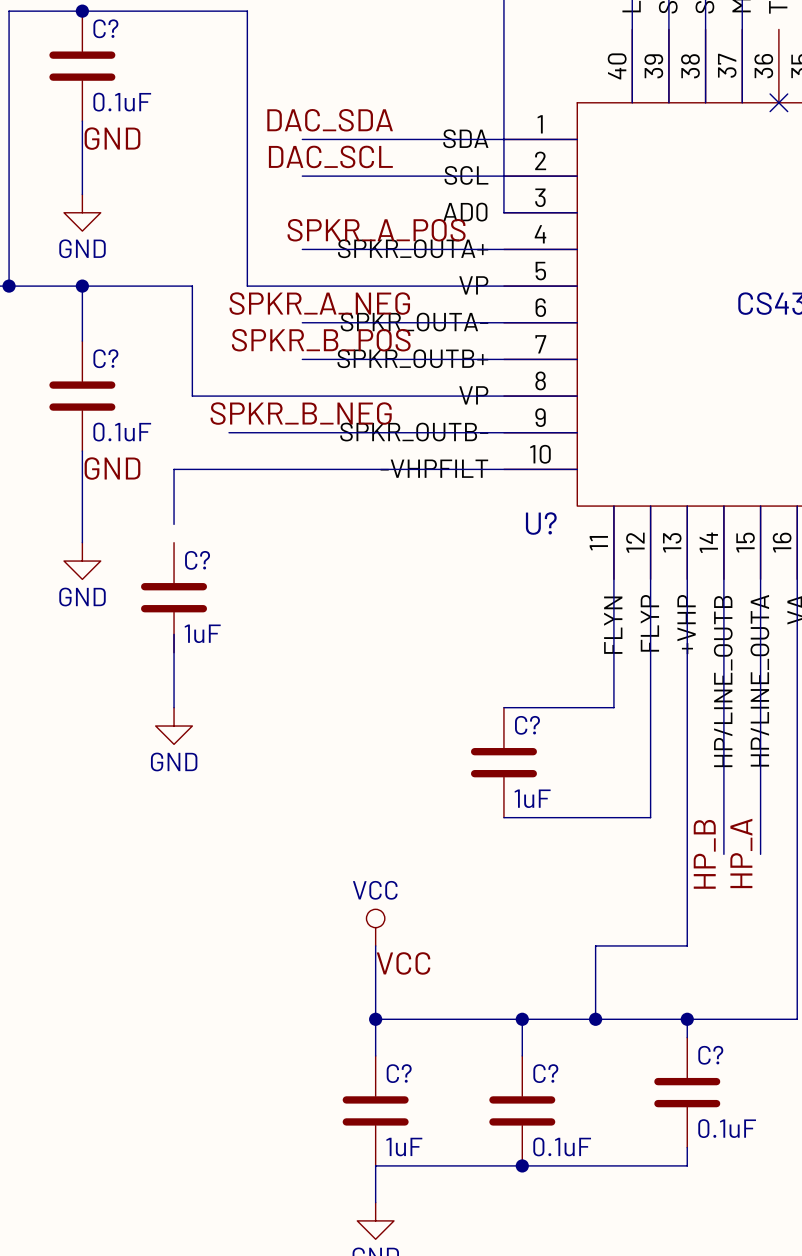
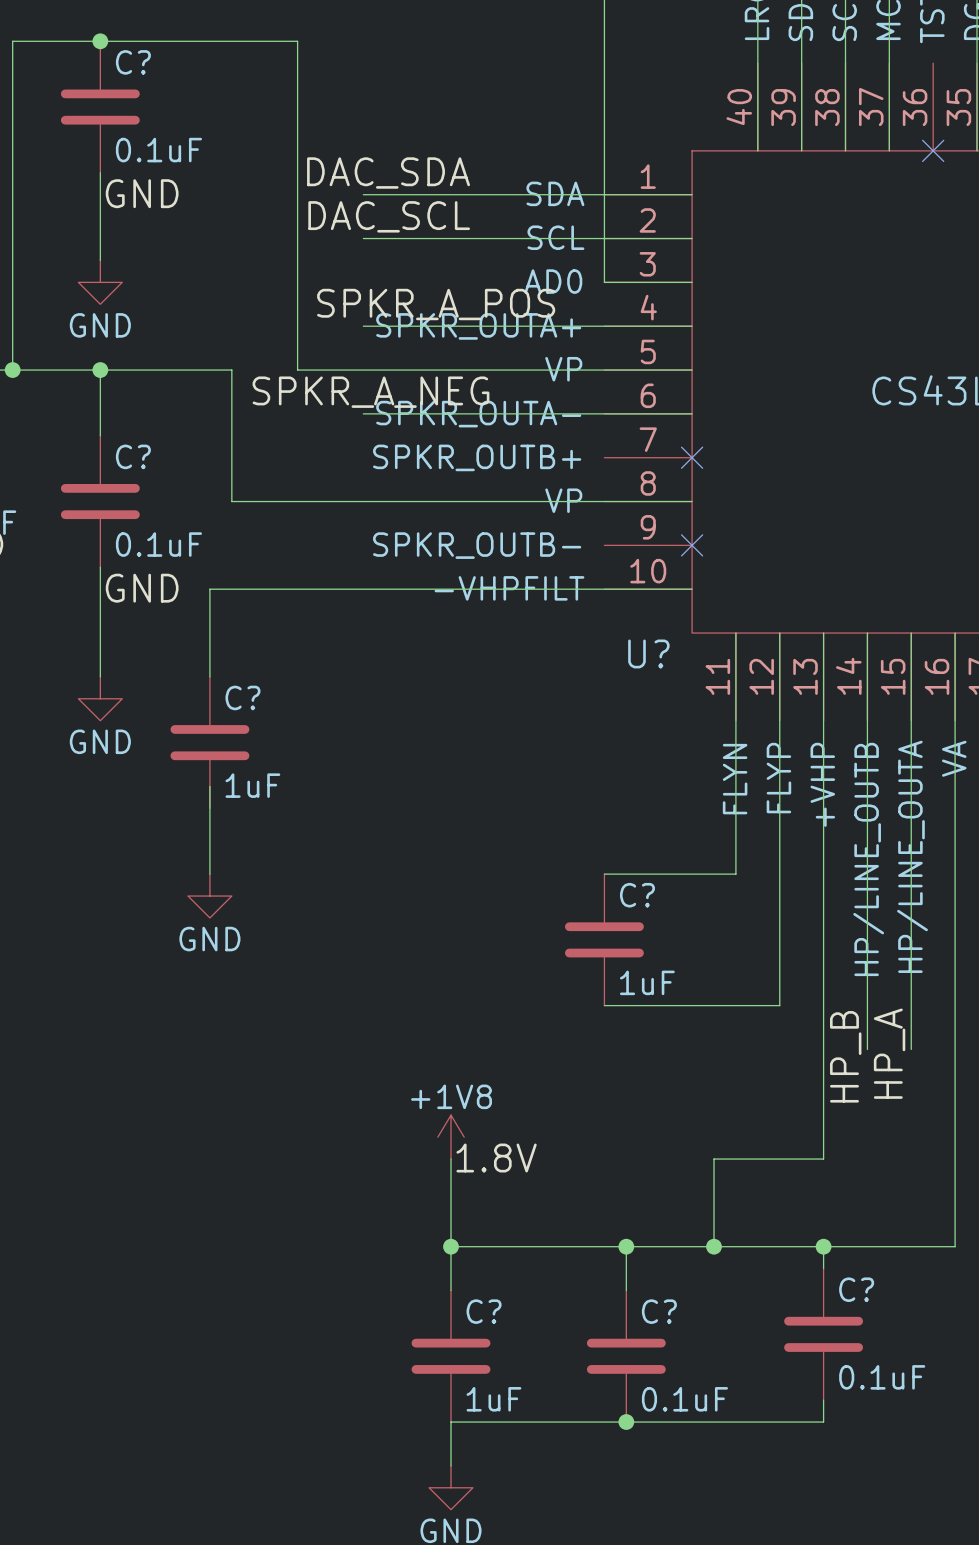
label: SPKR_B_POS (321, 340) -> none
wire: (302, 359) (577, 359) -> none
no-connect mark: none -> (692, 457)
label: SPKR_B_NEG (301, 413) -> none
wire: (229, 432) (577, 432) -> none
no-connect mark: none -> (692, 545)
wire: none -> (209, 654) (209, 676)
power symbol: VCC (375, 927) -> +1V8 (451, 1137)
label: none -> 1.8V (496, 1158)
label: VCC (403, 963) -> none

